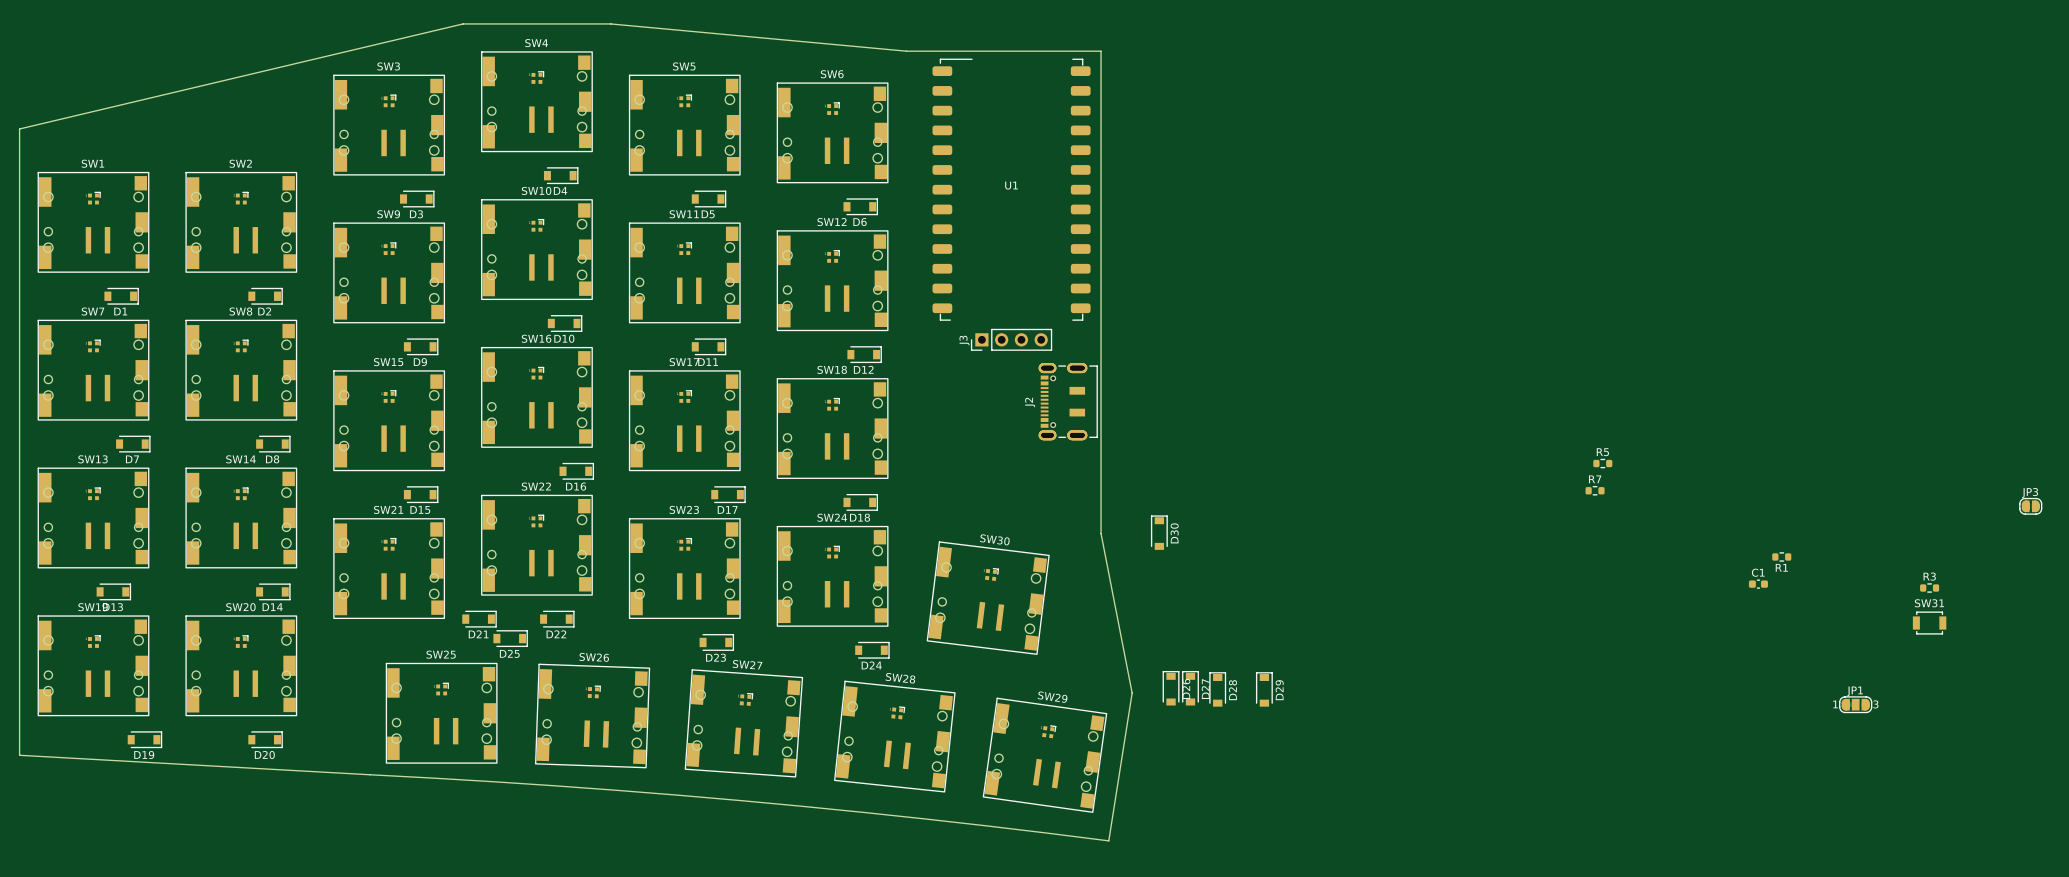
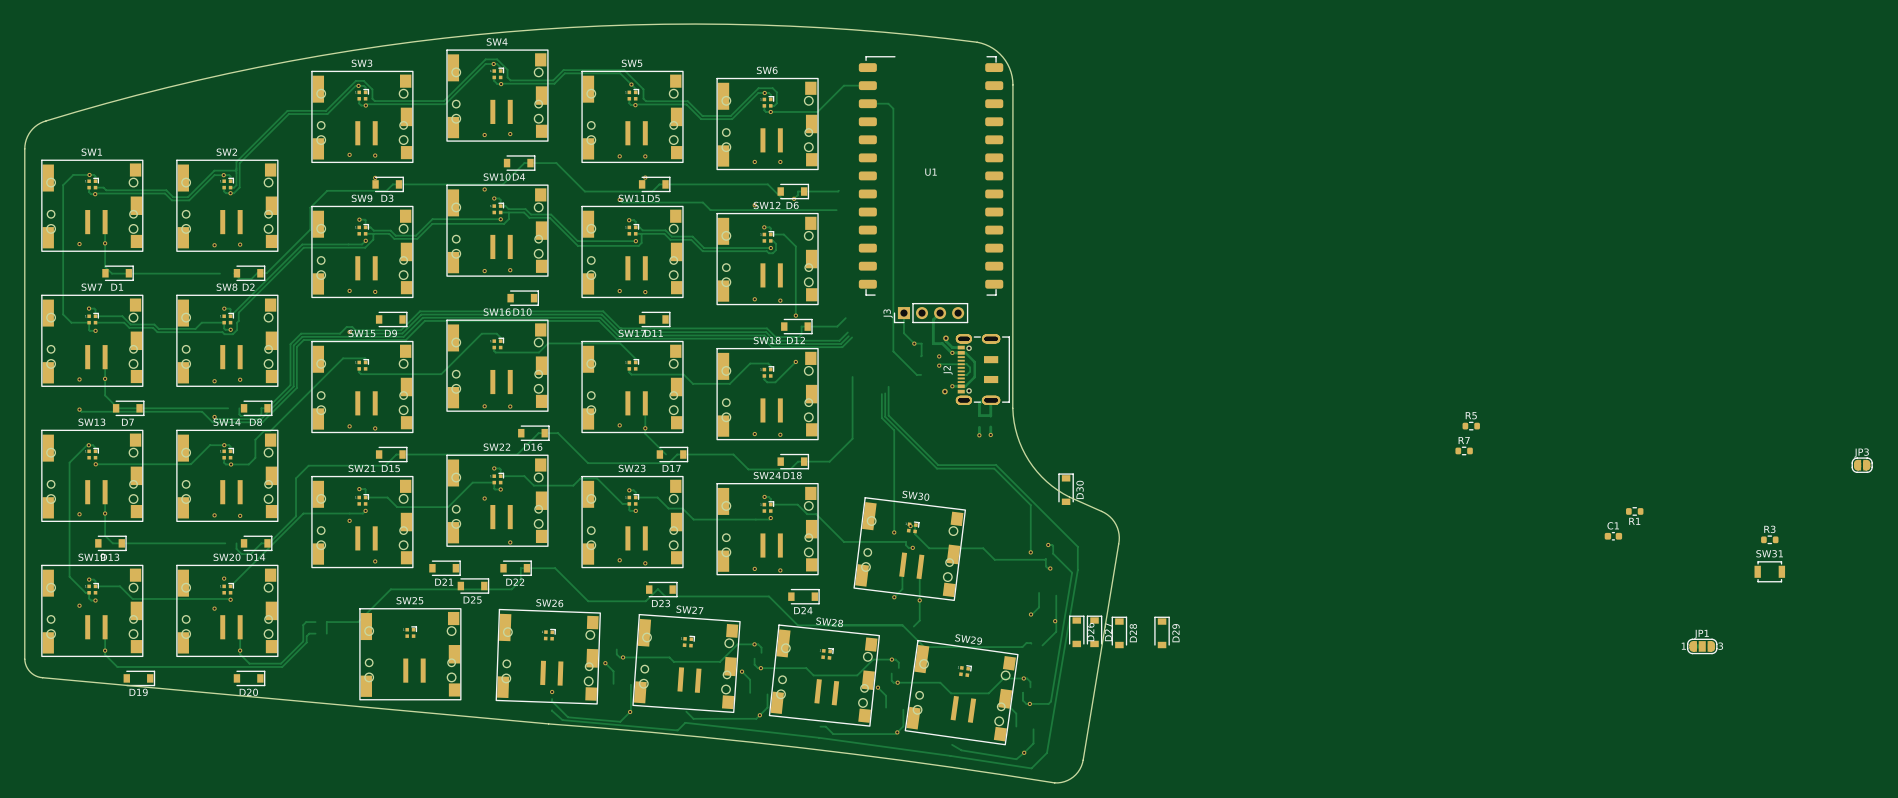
via: none -> (493, 64)
track: none -> (500, 71) (500, 67) (497, 64) (485, 64) (445, 104) (361, 105) (359, 98)
track: none -> (494, 77) (497, 84) (554, 83) (564, 73) (620, 73) (635, 88) (635, 92)
via: none -> (501, 84)
via: none -> (631, 84)
track: none -> (867, 85) (843, 85) (817, 111) (766, 111) (764, 105)
via: none -> (358, 85)
track: none -> (365, 92) (364, 85) (355, 85) (327, 114) (288, 114) (239, 163) (239, 187) (233, 193) (225, 193) (224, 187)
via: none -> (764, 93)
track: none -> (629, 98) (631, 105) (686, 104) (701, 119) (732, 119) (758, 93) (768, 93) (770, 99)
track: none -> (867, 103) (888, 103) (893, 108) (893, 351) (916, 374) (921, 374)
via: none -> (365, 105)
via: none -> (635, 105)
track: none -> (770, 105) (776, 103) (776, 92) (772, 88) (758, 88) (730, 115) (702, 115) (687, 101) (645, 101) (643, 98) (643, 89) (624, 70) (563, 70) (553, 80) (510, 80) (507, 77) (507, 69) (497, 59) (485, 59) (444, 101) (374, 101) (372, 98) (372, 89) (363, 80) (355, 80) (326, 110) (287, 110) (236, 161) (236, 185) (230, 187)
via: none -> (770, 111)
via: none -> (510, 134)
via: none -> (484, 135)
board edge: (19, 160) (19, 128) (463, 23) (610, 23) (906, 51) (1101, 51) (1101, 533) (1132, 693) (1108, 840) (863, 812) (616, 790) (19, 755) (19, 718) -> (24, 148) (28, 133) (40, 123) (136, 95) (289, 61) (445, 38) (570, 27) (726, 24) (852, 29) (946, 38) (985, 44) (1002, 57) (1009, 68) (1012, 80) (1012, 408) (1017, 435) (1025, 454) (1041, 476) (1063, 493) (1107, 514) (1116, 524) (1119, 537) (1082, 763) (1073, 776) (1058, 782) (903, 760) (751, 742) (42, 677) (30, 671) (24, 659)
via: none -> (349, 154)
via: none -> (375, 155)
via: none -> (619, 156)
via: none -> (645, 156)
via: none -> (754, 161)
via: none -> (780, 161)
track: none -> (236, 170) (214, 170) (187, 197) (173, 197) (166, 190) (106, 190) (103, 187) (95, 187)
via: none -> (89, 174)
via: none -> (223, 175)
via: none -> (375, 177)
via: none -> (645, 177)
track: none -> (95, 181) (94, 174) (73, 174) (63, 185) (63, 314) (71, 322) (89, 322) (89, 329) (95, 330)
track: none -> (230, 181) (229, 175) (214, 175) (189, 200) (171, 200) (165, 193) (91, 194) (89, 187)
via: none -> (484, 189)
track: none -> (838, 190) (798, 191) (798, 194) (794, 198) (782, 198) (767, 184) (659, 184) (652, 191) (584, 191) (556, 163) (524, 163) (503, 184) (392, 184) (386, 190) (327, 190) (310, 207) (310, 229) (266, 273) (257, 273) (251, 278) (239, 278) (234, 273)
via: none -> (230, 193)
via: none -> (95, 194)
track: none -> (494, 198) (499, 198) (500, 206) (505, 206) (508, 209) (525, 209) (530, 214) (551, 214) (577, 241) (635, 241)
via: none -> (494, 198)
via: none -> (794, 198)
track: none -> (619, 199) (622, 202) (702, 202) (710, 210) (836, 210)
via: none -> (619, 199)
via: none -> (754, 205)
track: none -> (500, 212) (524, 212) (529, 217) (549, 217) (577, 245) (638, 245) (641, 242) (641, 233)
track: none -> (508, 212) (508, 219) (504, 223) (432, 223) (417, 238) (394, 238) (389, 233) (365, 233)
via: none -> (359, 219)
track: none -> (500, 219) (432, 219) (415, 235) (395, 235) (390, 230) (373, 230) (370, 227) (365, 227) (365, 219) (359, 219)
via: none -> (500, 219)
track: none -> (629, 220) (634, 220) (635, 227) (639, 227) (642, 230) (665, 230) (671, 236) (692, 236) (704, 248) (770, 248)
via: none -> (629, 220)
track: none -> (105, 222) (105, 266) (111, 273) (219, 273)
track: none -> (764, 227) (770, 228) (770, 234) (783, 234) (795, 246) (795, 315)
via: none -> (764, 227)
track: none -> (373, 233) (373, 239) (365, 247) (303, 247) (238, 312) (237, 330) (232, 334) (224, 334) (222, 332) (157, 332) (153, 327) (129, 327) (124, 322) (95, 322)
track: none -> (635, 233) (664, 233) (670, 239) (691, 239) (702, 251) (766, 251) (772, 253) (776, 250) (776, 243) (770, 240)
track: none -> (365, 240) (362, 244) (302, 244) (230, 316) (230, 309) (224, 308)
via: none -> (365, 240)
via: none -> (635, 241)
via: none -> (105, 243)
via: none -> (79, 244)
via: none -> (240, 244)
via: none -> (214, 245)
via: none -> (770, 248)
via: none -> (510, 270)
via: none -> (484, 271)
via: none -> (349, 290)
via: none -> (619, 291)
via: none -> (375, 291)
via: none -> (645, 292)
via: none -> (754, 299)
via: none -> (780, 300)
track: none -> (89, 308) (95, 309) (95, 316) (122, 316) (130, 324) (154, 324) (158, 328) (195, 328) (201, 322) (224, 322) (224, 328) (230, 329)
via: none -> (89, 308)
via: none -> (224, 308)
track: none -> (903, 313) (903, 333) (914, 343) (921, 343) (921, 356)
track: none -> (940, 314) (940, 313) (933, 319) (933, 343) (942, 343) (951, 352) (965, 352) (974, 362) (974, 377) (965, 386) (952, 386)
via: none -> (795, 315)
track: none -> (845, 318) (837, 326) (801, 326) (801, 334) (798, 337) (775, 337) (766, 328) (620, 328) (603, 311) (419, 311) (401, 330) (355, 330) (352, 327) (346, 327) (340, 333) (301, 333) (290, 344) (290, 385) (267, 408) (261, 408) (259, 415) (240, 415) (239, 408)
via: none -> (230, 329)
via: none -> (95, 330)
track: none -> (349, 332) (402, 333) (421, 314) (601, 314) (619, 332) (766, 332) (774, 340) (839, 340) (847, 332)
via: none -> (349, 332)
track: none -> (848, 336) (840, 343) (773, 343) (764, 335) (618, 335) (600, 317) (422, 317) (403, 336) (302, 336) (293, 345) (293, 386) (261, 419) (216, 419) (214, 416)
track: none -> (852, 337) (842, 347) (771, 347) (763, 338) (616, 338) (599, 320) (424, 320) (405, 340) (303, 340) (296, 346) (296, 387) (262, 422) (212, 422) (202, 411) (81, 411) (79, 409)
track: none -> (945, 338) (945, 341) (952, 347) (961, 347)
via: none -> (945, 338)
track: none -> (500, 341) (500, 337) (496, 333) (481, 333) (441, 374) (360, 374) (359, 368)
via: none -> (914, 343)
track: none -> (494, 347) (495, 352) (539, 352) (548, 343) (620, 343) (635, 358) (635, 362)
via: none -> (952, 352)
via: none -> (939, 356)
track: none -> (105, 357) (105, 395) (117, 408) (228, 408)
track: none -> (365, 362) (365, 358) (343, 358) (270, 431) (263, 431) (255, 439) (255, 457) (248, 464) (225, 464) (224, 457)
track: none -> (795, 361) (775, 382) (767, 382) (764, 375)
via: none -> (795, 361)
track: none -> (939, 365) (966, 364) (970, 367) (970, 371) (966, 374) (961, 374)
via: none -> (939, 365)
track: none -> (629, 368) (631, 374) (683, 374) (692, 383) (729, 383) (750, 363) (768, 363) (770, 369)
track: none -> (852, 376) (852, 438) (829, 461) (798, 461) (790, 469) (748, 469) (733, 454) (677, 454) (668, 463) (588, 463) (558, 433) (538, 433) (517, 454) (396, 454) (385, 465) (308, 465) (296, 478) (296, 516) (269, 543) (261, 543) (250, 554) (241, 554) (236, 548) (236, 543)
via: none -> (105, 378)
via: none -> (79, 379)
via: none -> (240, 379)
via: none -> (214, 381)
via: none -> (952, 386)
track: none -> (888, 386) (888, 415) (938, 465) (996, 465) (1077, 546) (1077, 570) (1046, 752) (1031, 768) (819, 737) (685, 722) (677, 730) (562, 720) (552, 710)
via: none -> (944, 391)
track: none -> (885, 393) (885, 416) (936, 468) (994, 468) (1030, 505) (1030, 552)
track: none -> (881, 394) (881, 417) (894, 430) (894, 532)
track: none -> (982, 400) (979, 403) (979, 415) (990, 415) (991, 400) (982, 400)
track: none -> (645, 403) (645, 433) (666, 454)
via: none -> (484, 406)
via: none -> (510, 406)
via: none -> (79, 409)
via: none -> (214, 416)
via: none -> (619, 425)
via: none -> (349, 426)
track: none -> (979, 427) (979, 435)
track: none -> (990, 426) (990, 434)
via: none -> (645, 428)
via: none -> (375, 428)
via: none -> (754, 434)
via: none -> (780, 434)
via: none -> (979, 435)
via: none -> (990, 434)
via: none -> (88, 445)
via: none -> (224, 445)
track: none -> (95, 451) (93, 445) (86, 445) (69, 462) (69, 576) (85, 592) (89, 592) (91, 600) (95, 600)
track: none -> (230, 451) (229, 445) (210, 445) (190, 464) (95, 464)
via: none -> (95, 464)
via: none -> (231, 464)
track: none -> (494, 468) (500, 469) (500, 476) (524, 476) (533, 485) (573, 485) (580, 478) (597, 478) (622, 503) (629, 503) (630, 510) (635, 510)
via: none -> (494, 468)
track: none -> (359, 489) (365, 489) (365, 497) (387, 497) (397, 507) (448, 507) (472, 482) (494, 482) (494, 488) (500, 489)
via: none -> (359, 489)
via: none -> (500, 489)
track: none -> (629, 490) (635, 492) (635, 497) (657, 497) (668, 508) (682, 508) (693, 519) (770, 518)
via: none -> (629, 490)
track: none -> (105, 492) (105, 535) (112, 543) (225, 543)
track: none -> (764, 496) (770, 498) (770, 504) (797, 504) (807, 514) (816, 514) (843, 541) (906, 541) (908, 547) (912, 547)
via: none -> (764, 496)
via: none -> (484, 498)
track: none -> (365, 510) (362, 513) (303, 513) (230, 586)
via: none -> (365, 510)
via: none -> (635, 510)
via: none -> (105, 513)
via: none -> (79, 514)
via: none -> (214, 515)
via: none -> (240, 515)
via: none -> (770, 518)
via: none -> (349, 520)
track: none -> (910, 526) (915, 526) (915, 534) (929, 548) (983, 548) (994, 559) (1045, 559) (1045, 566) (1050, 568)
via: none -> (910, 526)
via: none -> (894, 532)
via: none -> (510, 542)
track: none -> (1048, 545) (1053, 545) (1053, 553) (1072, 572) (1050, 701) (1048, 703) (1026, 703) (1023, 700) (1023, 692)
via: none -> (1048, 545)
via: none -> (912, 547)
via: none -> (1030, 552)
via: none -> (619, 560)
via: none -> (375, 561)
via: none -> (645, 563)
via: none -> (754, 568)
via: none -> (1050, 568)
via: none -> (780, 570)
track: none -> (902, 573) (902, 589) (894, 597)
track: none -> (919, 576) (919, 620) (913, 626)
via: none -> (224, 578)
track: none -> (89, 579) (95, 581) (95, 586) (120, 586) (132, 598) (230, 599)
via: none -> (89, 579)
track: none -> (1039, 592) (1039, 607) (1031, 614)
track: none -> (1056, 595) (1056, 631) (1042, 645)
via: none -> (894, 597)
via: none -> (230, 599)
via: none -> (95, 600)
via: none -> (919, 600)
via: none -> (79, 605)
via: none -> (214, 608)
via: none -> (1031, 614)
via: none -> (1055, 621)
track: none -> (315, 622) (306, 622) (303, 625) (303, 641) (281, 663) (249, 663) (240, 654) (240, 627)
track: none -> (105, 627) (105, 654) (117, 666) (282, 666) (306, 642) (306, 636) (309, 633) (315, 633)
track: none -> (326, 633) (326, 622) (358, 622) (390, 589) (511, 589) (520, 580) (520, 568) (555, 568) (588, 601) (645, 601) (657, 589) (665, 596) (769, 596) (797, 625) (902, 625) (924, 647) (1022, 647) (1026, 643) (1031, 643)
via: none -> (754, 644)
track: none -> (616, 649) (616, 654) (619, 657) (669, 657) (673, 661) (720, 661) (737, 644) (758, 644) (761, 647) (761, 652)
via: none -> (105, 650)
via: none -> (240, 650)
via: none -> (623, 657)
track: none -> (754, 658) (754, 664) (758, 668) (806, 668) (813, 675) (857, 675) (873, 659) (895, 659) (898, 662) (898, 667)
via: none -> (891, 659)
track: none -> (605, 663) (613, 671) (613, 683)
via: none -> (605, 663)
via: none -> (760, 668)
track: none -> (742, 671) (750, 679) (750, 692)
via: none -> (742, 671)
track: none -> (891, 673) (893, 682) (940, 682) (951, 693) (988, 693) (1003, 678) (1027, 678) (1030, 681) (1030, 687)
via: none -> (1023, 678)
via: none -> (897, 682)
track: none -> (630, 684) (630, 711) (620, 721) (568, 717) (552, 699)
track: none -> (877, 687) (886, 695) (886, 707)
via: none -> (877, 687)
via: none -> (552, 691)
track: none -> (767, 694) (767, 707) (756, 718) (693, 718) (686, 711)
via: none -> (1029, 703)
track: none -> (1008, 705) (1016, 713) (1016, 726)
track: none -> (903, 709) (903, 726) (895, 734) (833, 734) (825, 726) (820, 726)
via: none -> (630, 712)
via: none -> (759, 715)
track: none -> (1033, 729) (1033, 743) (1016, 759) (961, 750) (952, 744)
via: none -> (897, 732)
via: none -> (1024, 752)

